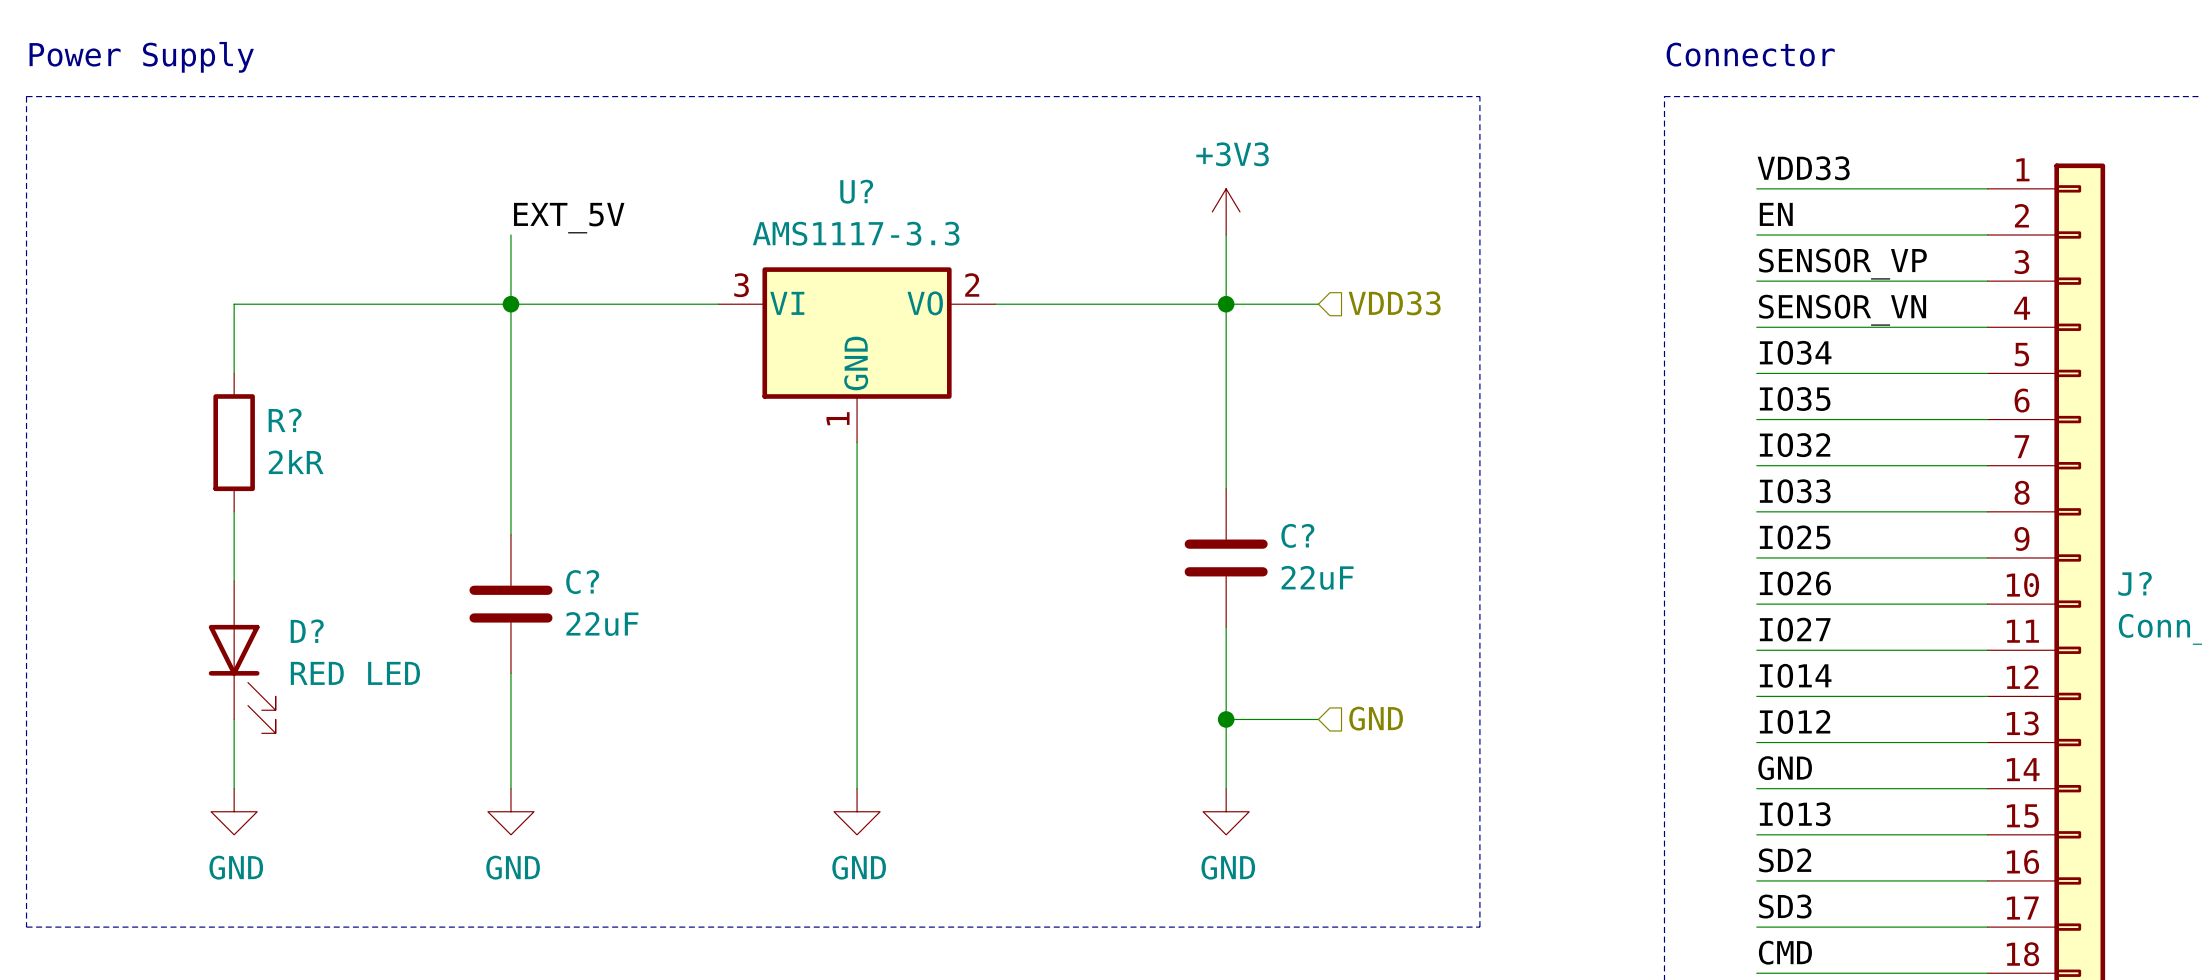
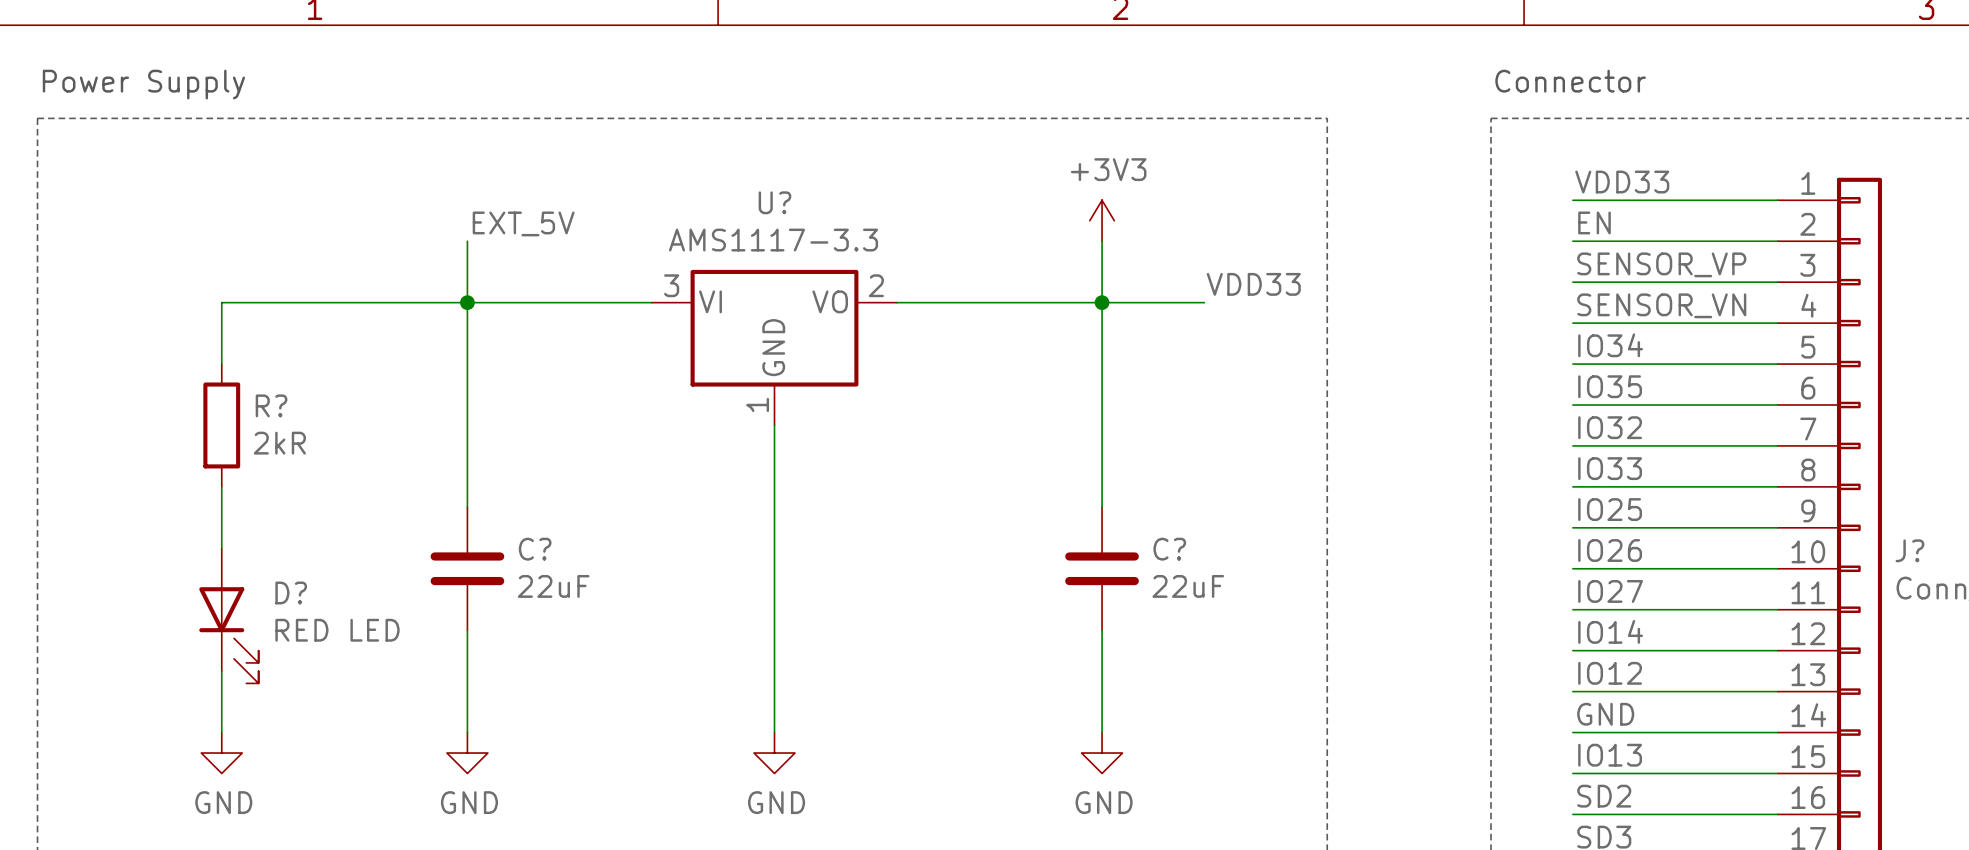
label: none -> VDD33 (1253, 284)
hierarchical label: VDD33 (1394, 303) -> none
wire: none -> (1183, 302) (1204, 302)
C? position: (1226, 557) -> (1102, 568)
hierarchical label: GND (1376, 718) -> none
wire: (1226, 719) (1318, 719) -> none
junction: (1226, 719) -> none

